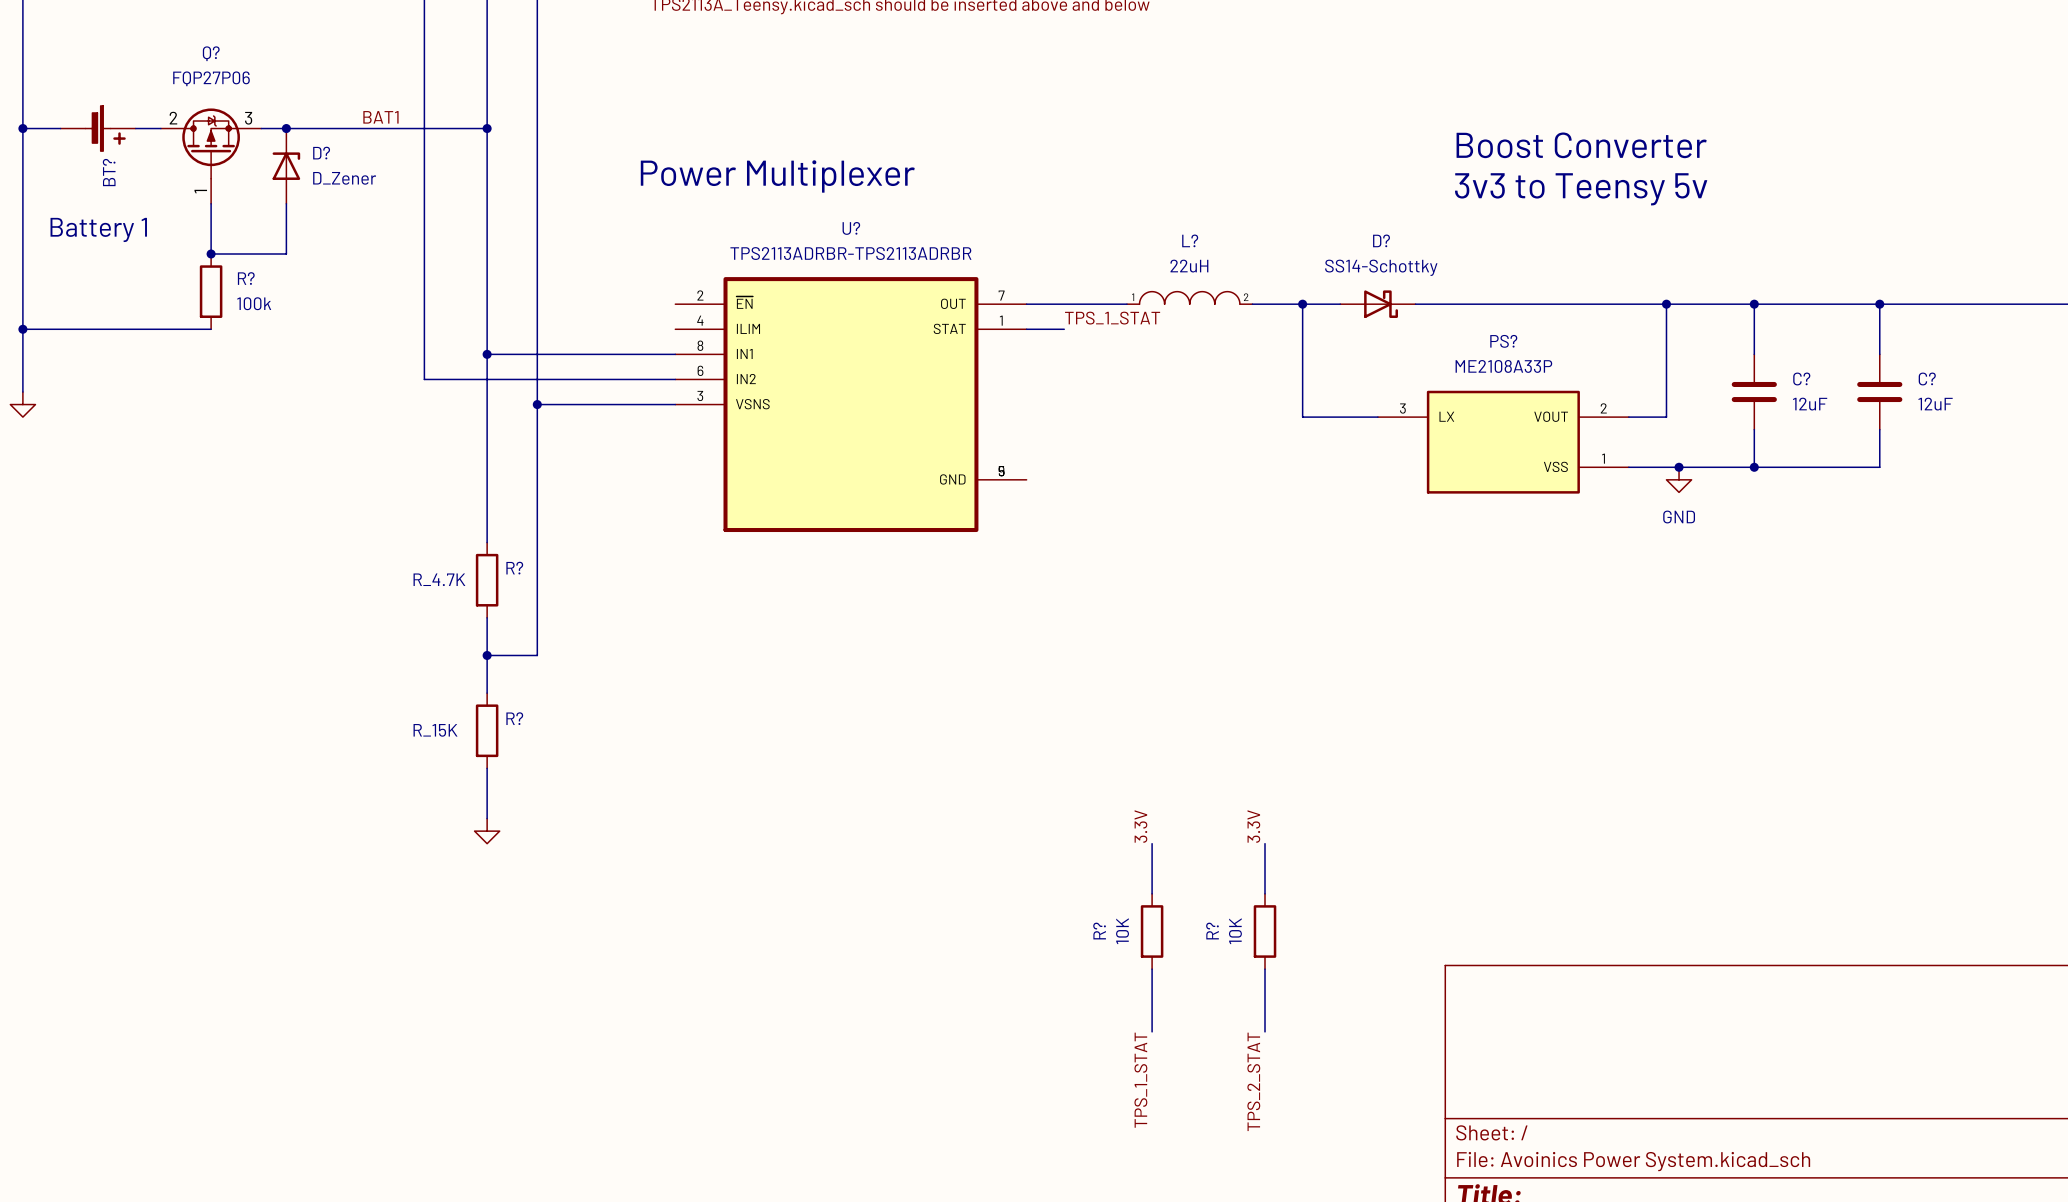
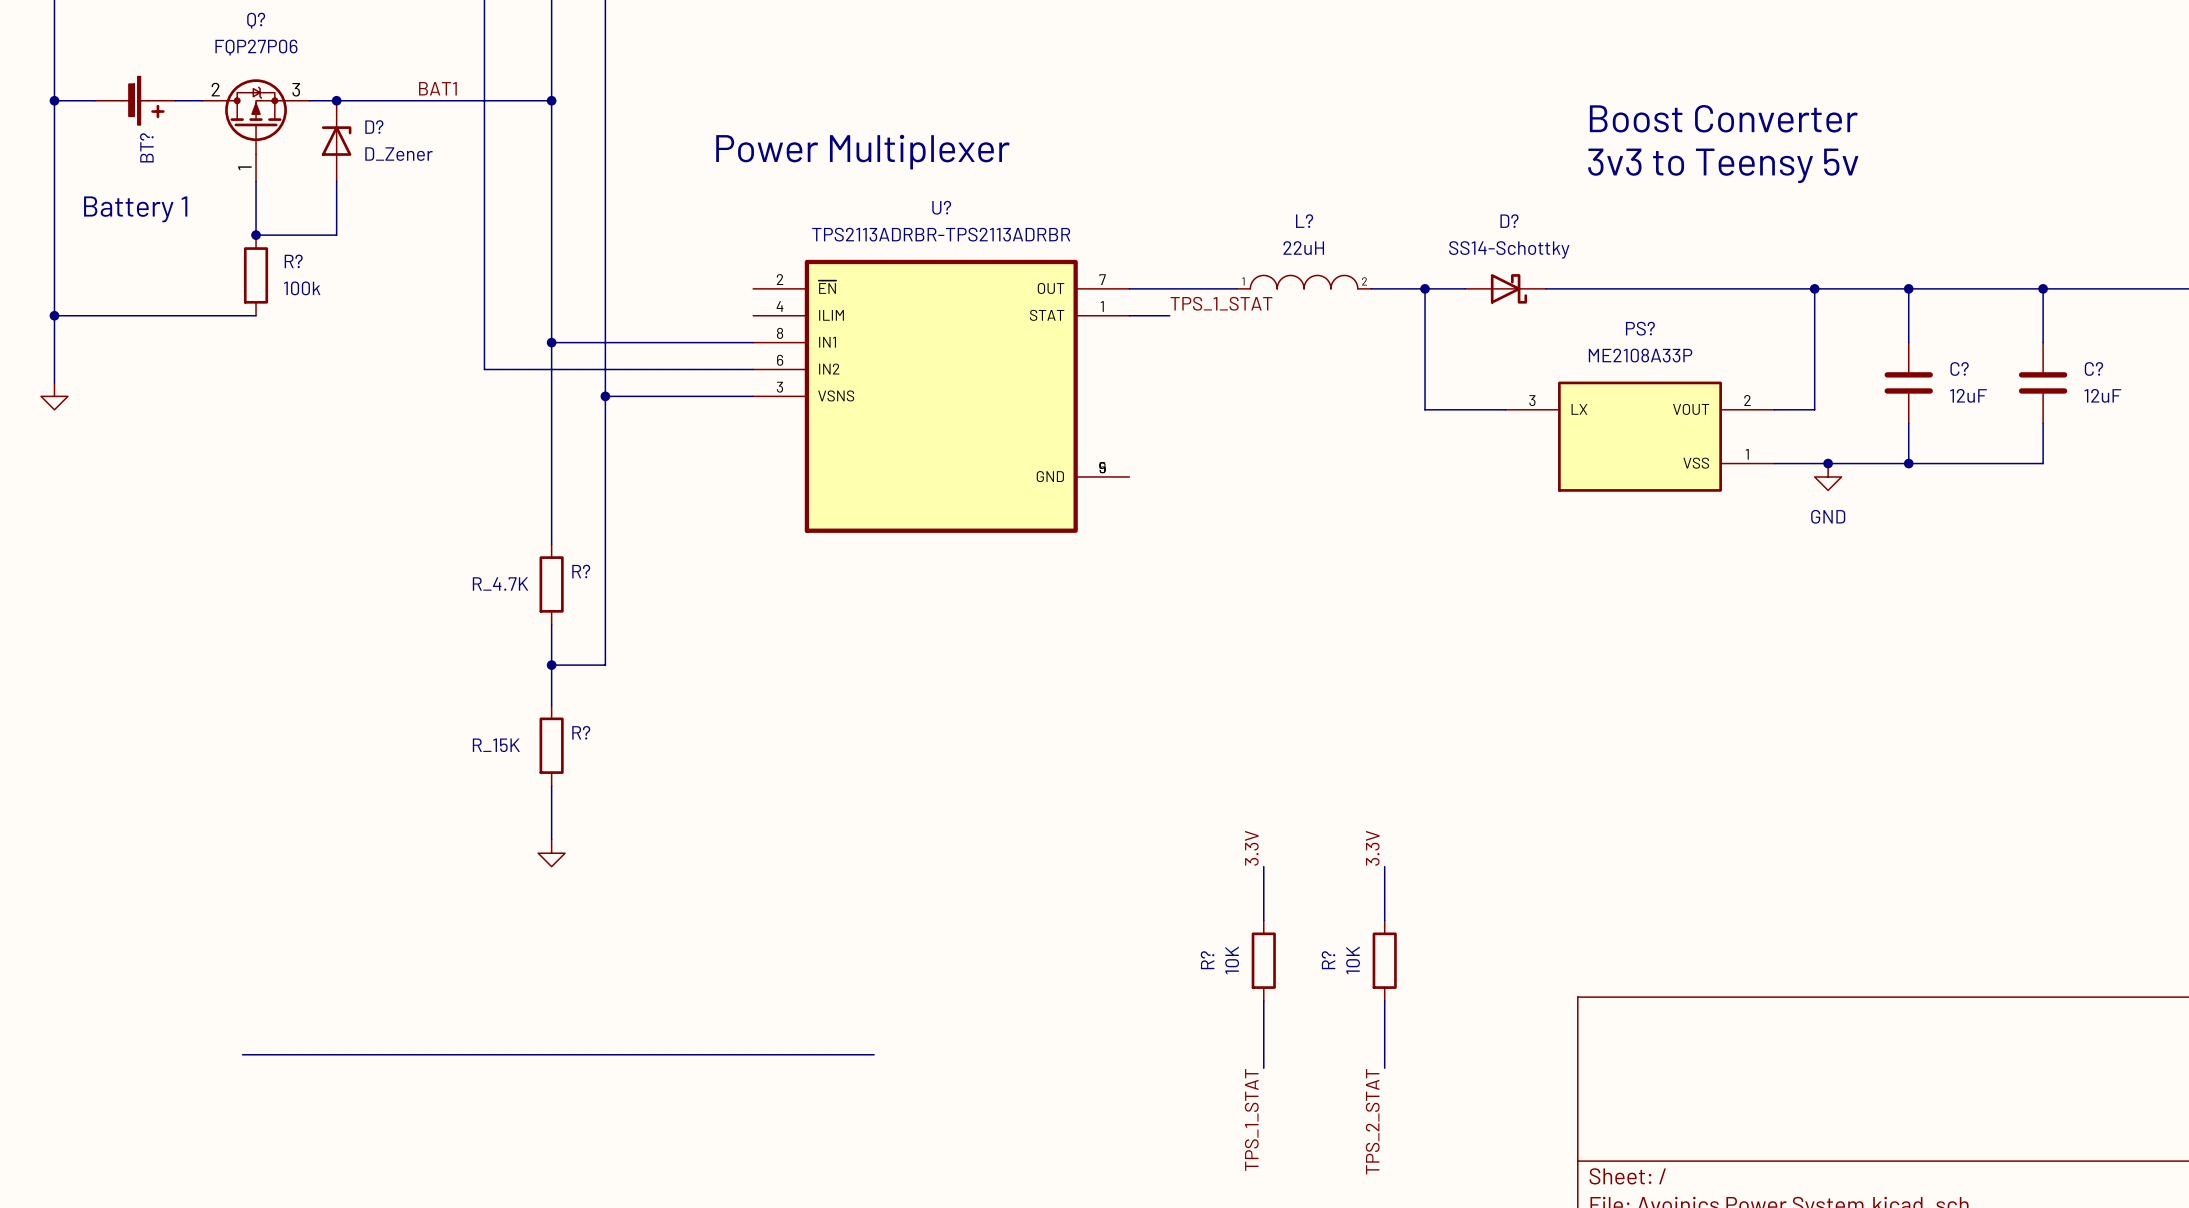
wire: none -> (242, 1054) (874, 1054)

